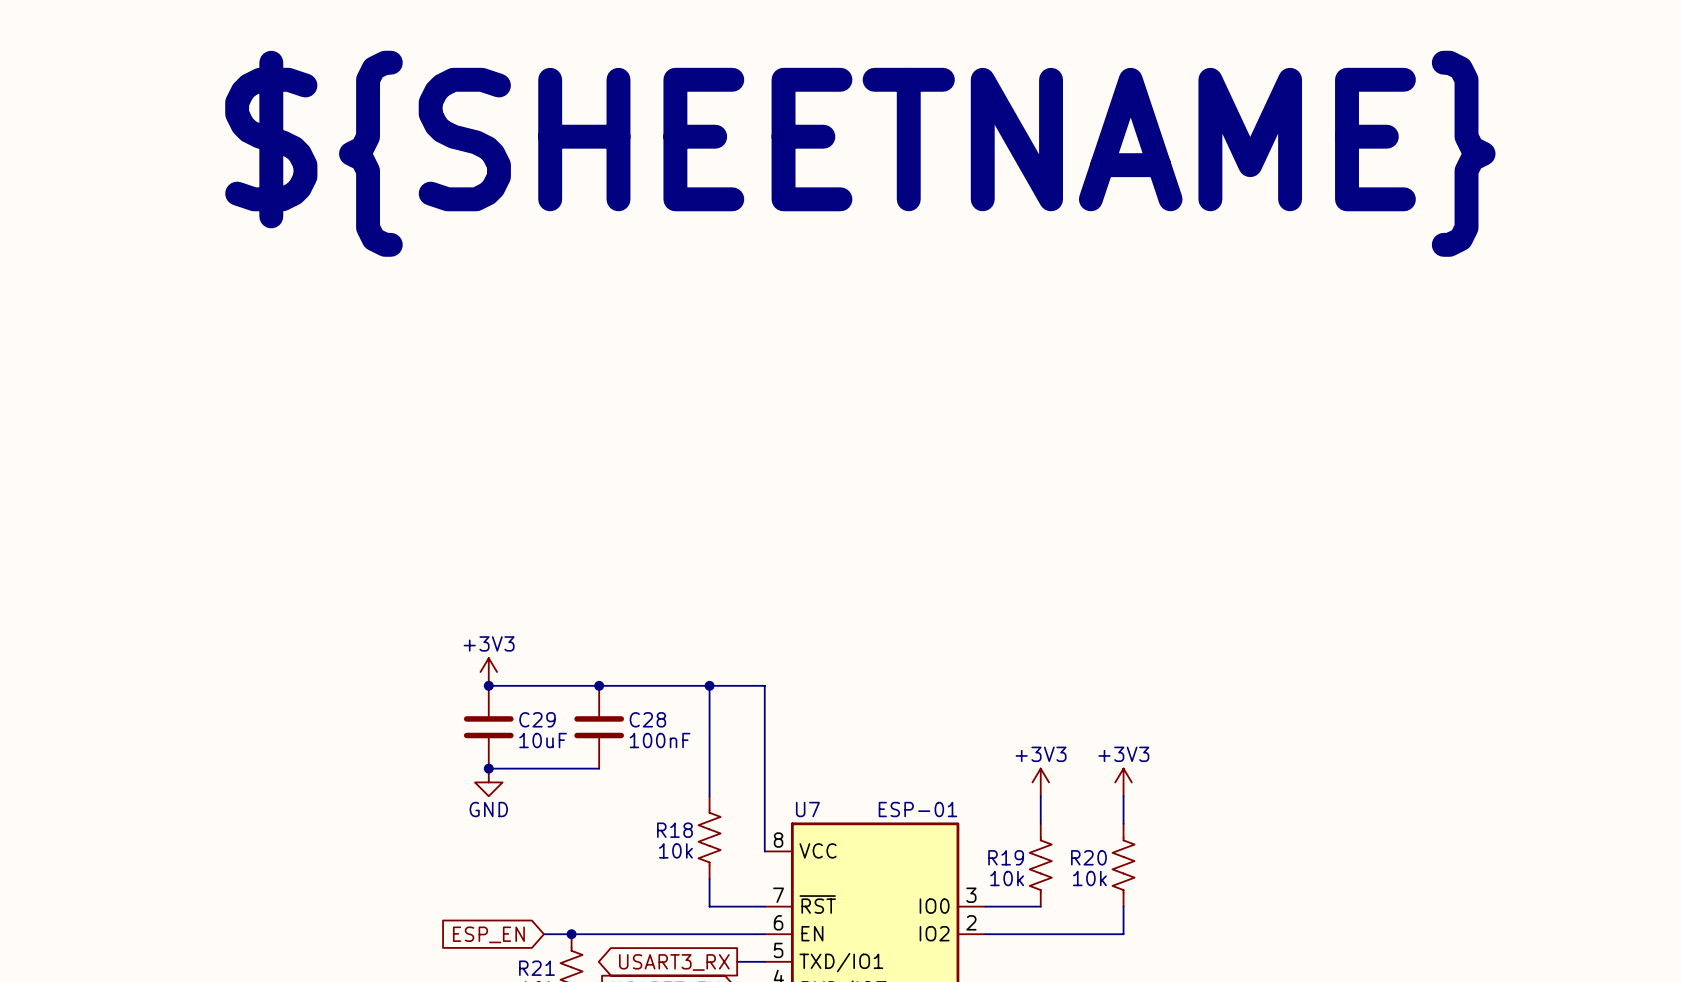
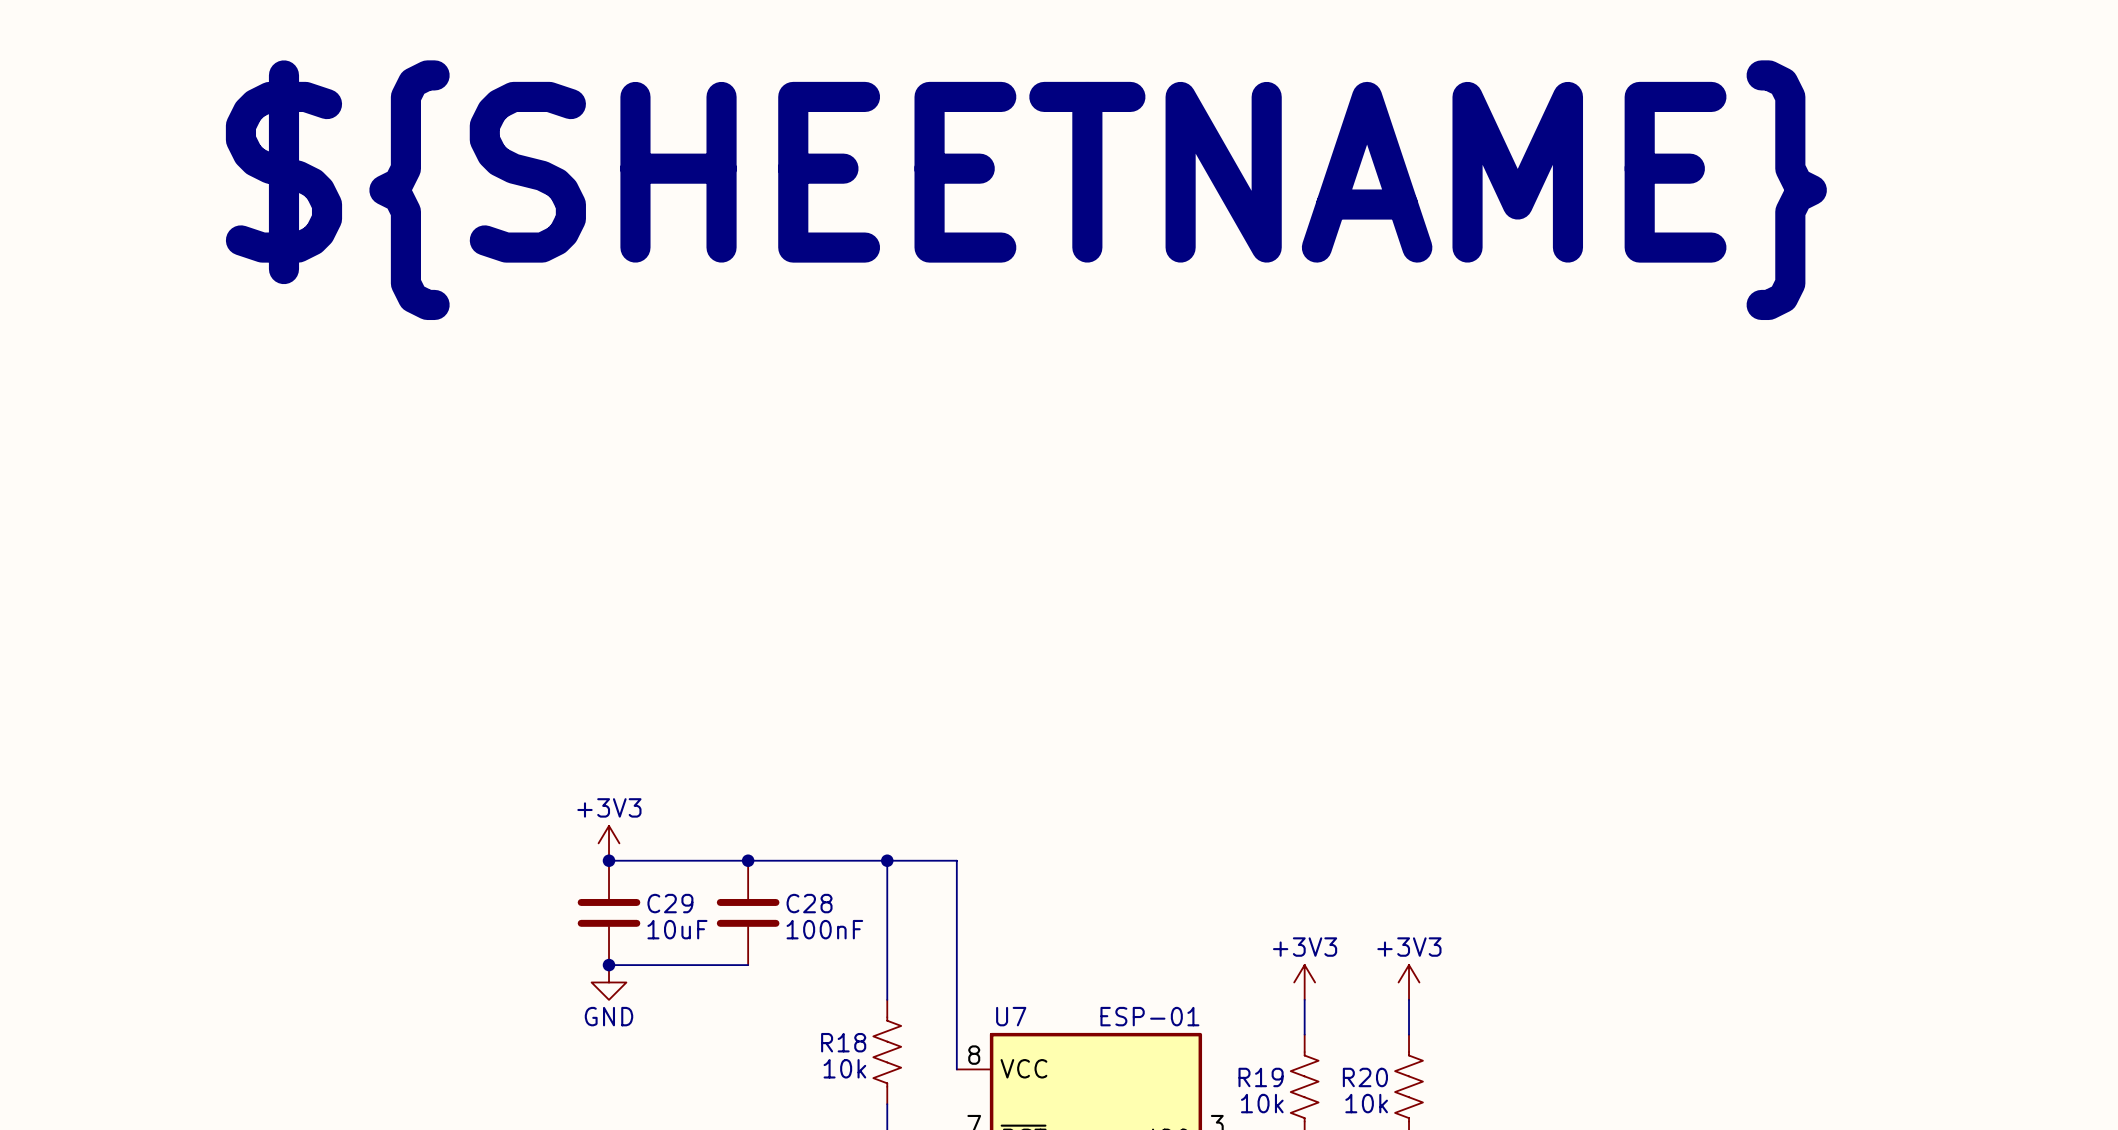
text position: ${SHEETNAME} (860, 153) -> ${SHEETNAME} (1026, 190)

